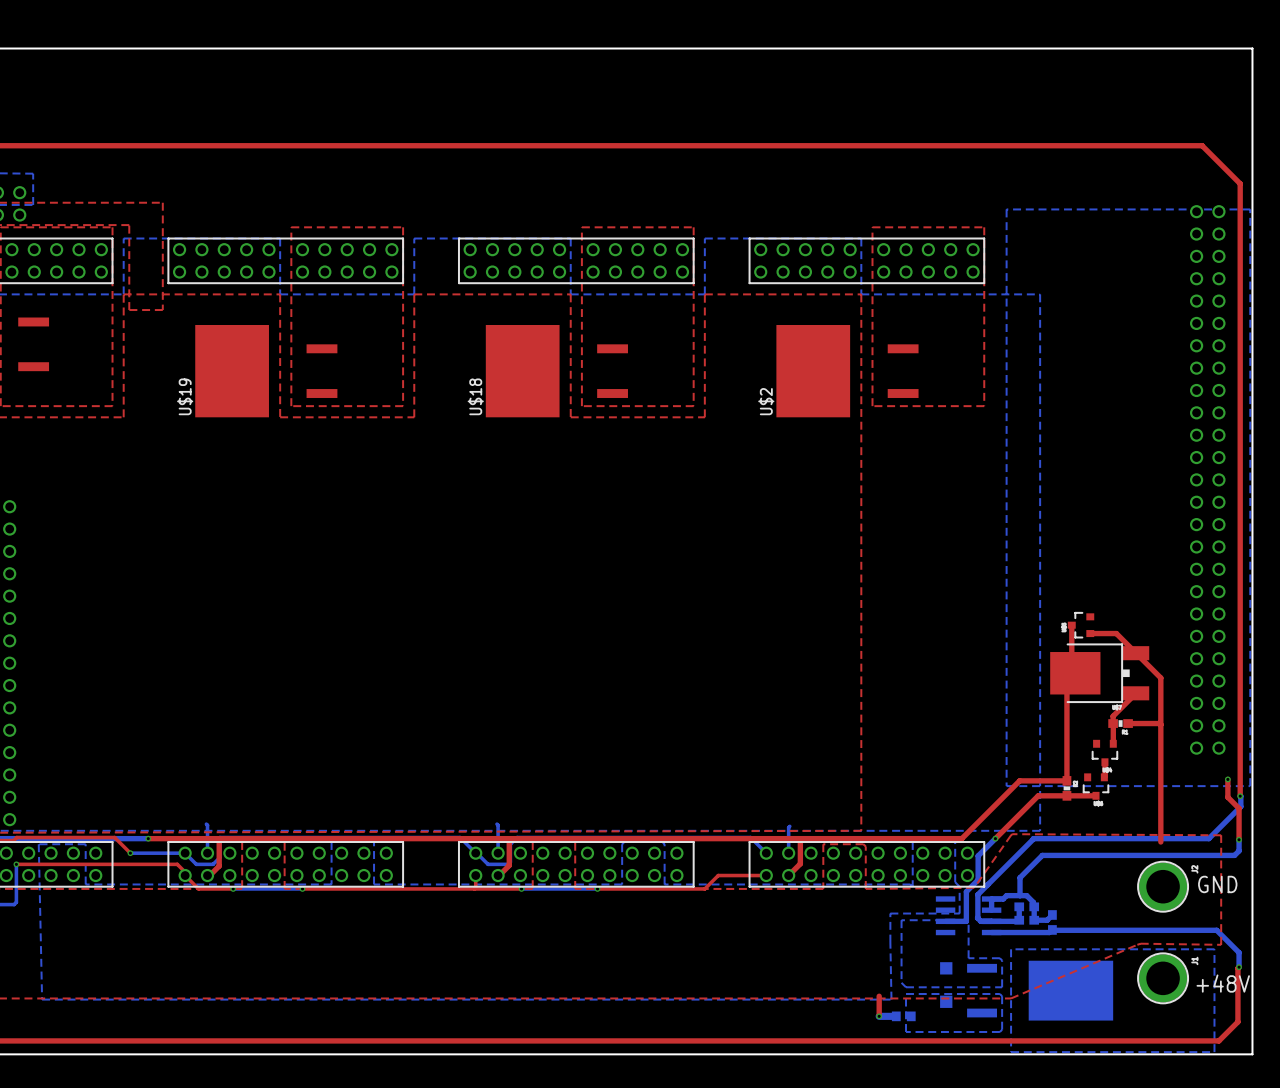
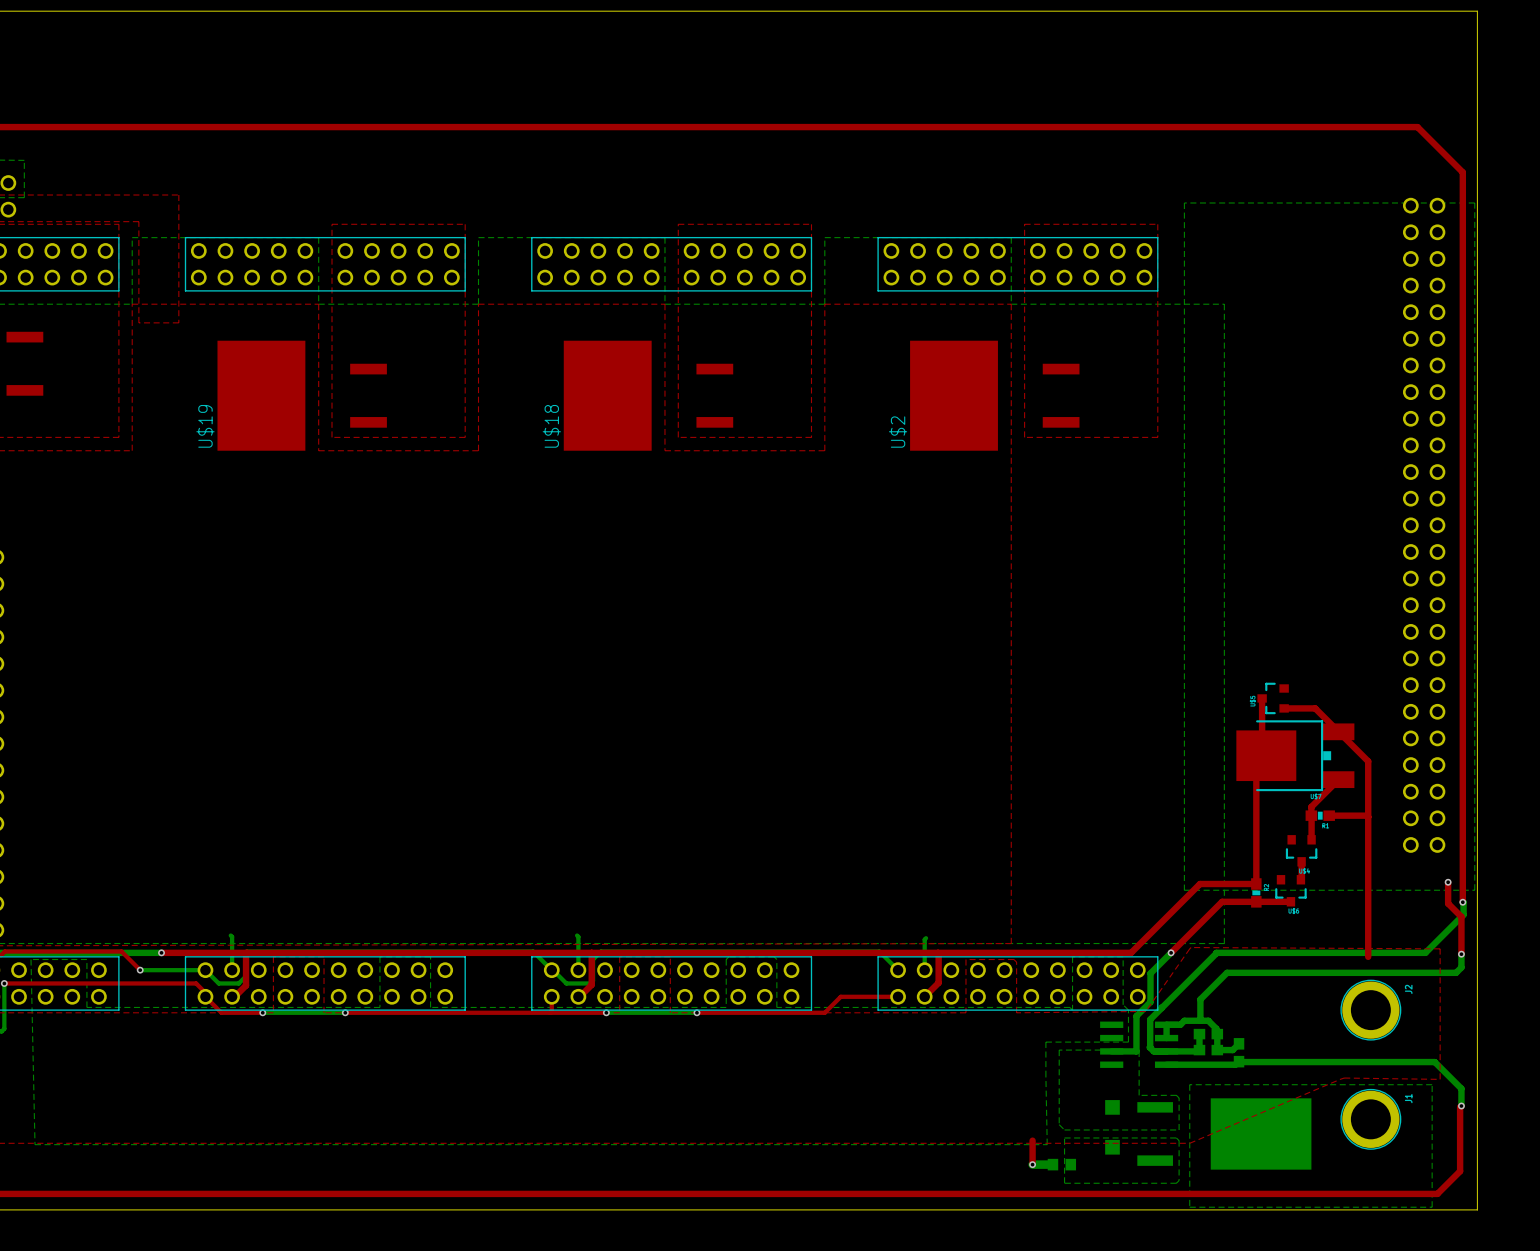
text: GND (1217, 884) -> none
text: +48V (1223, 983) -> none

